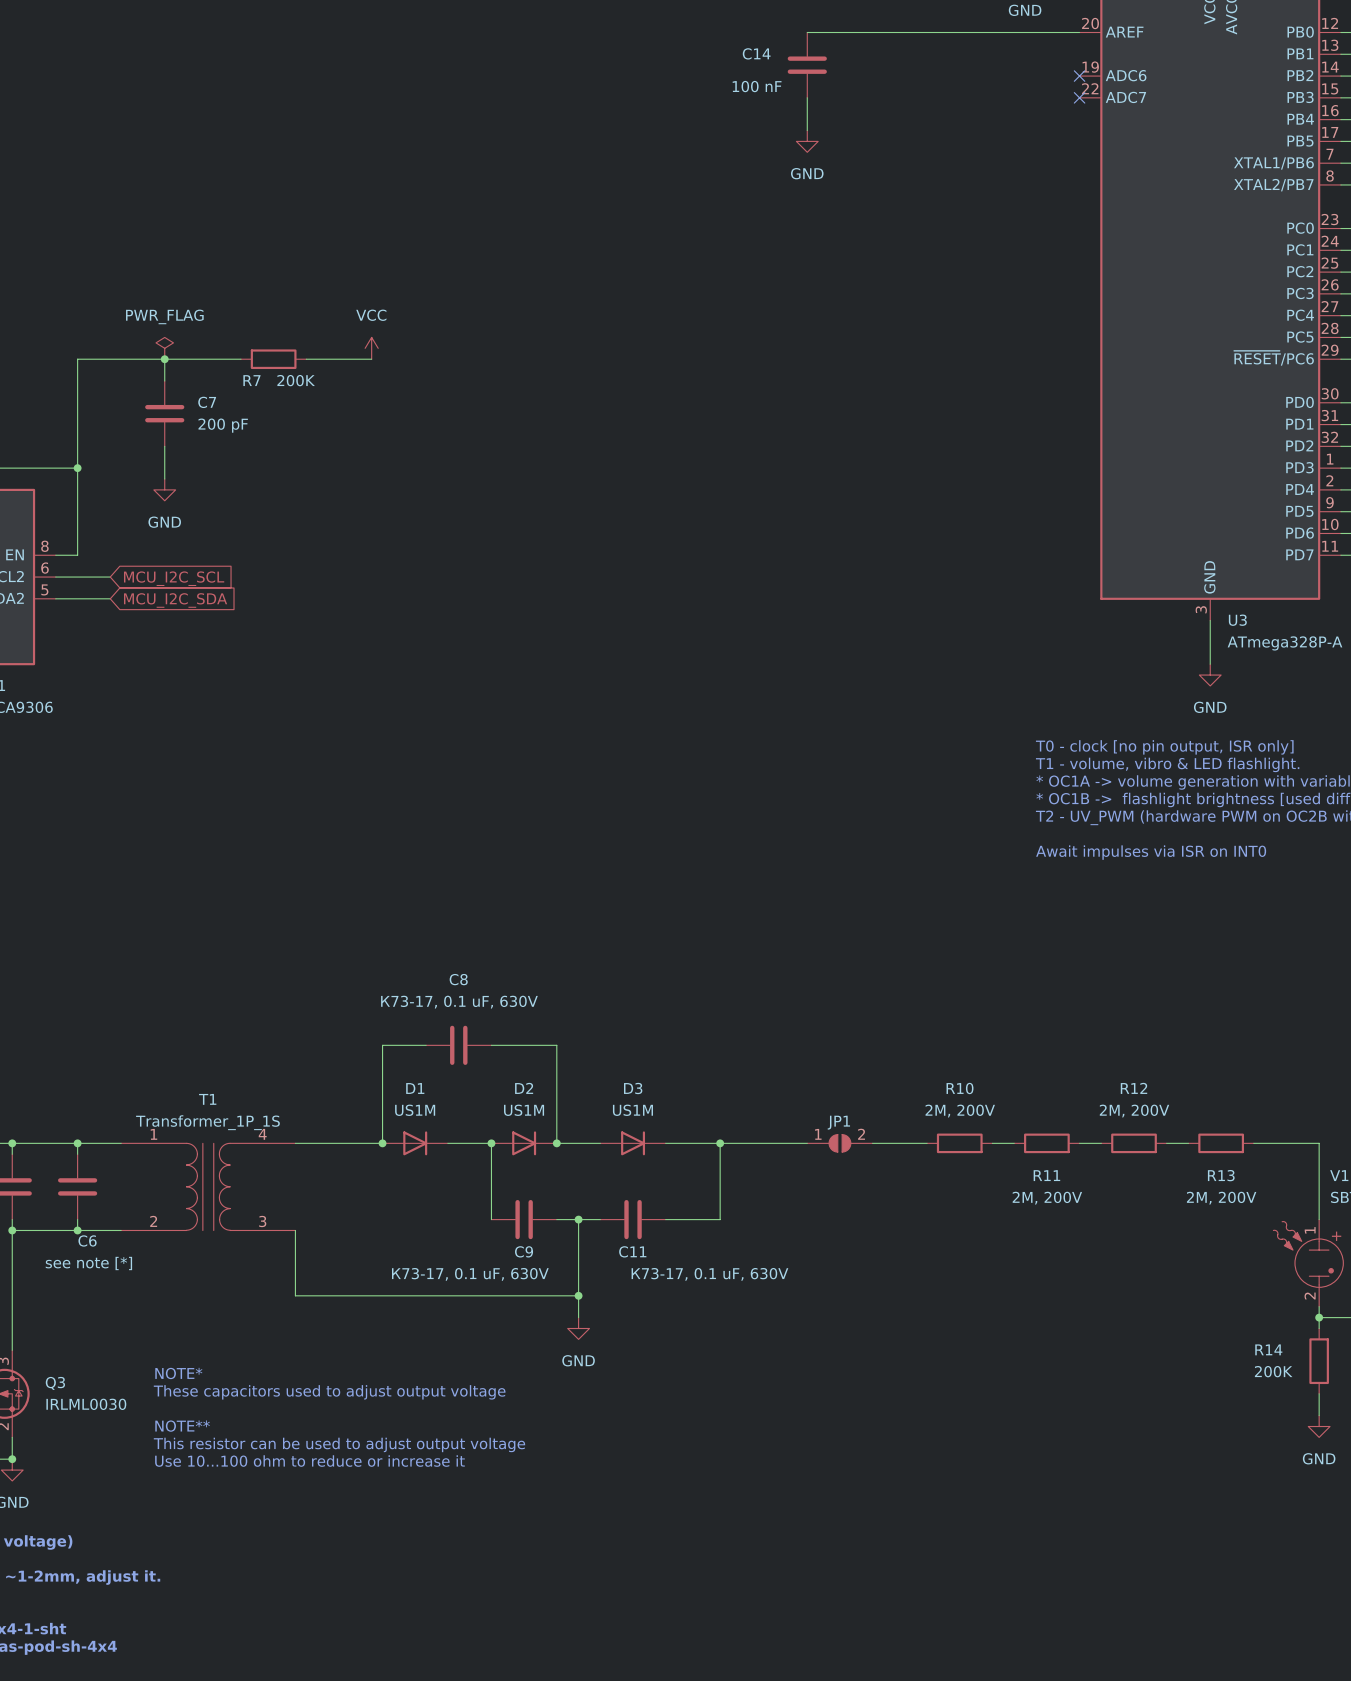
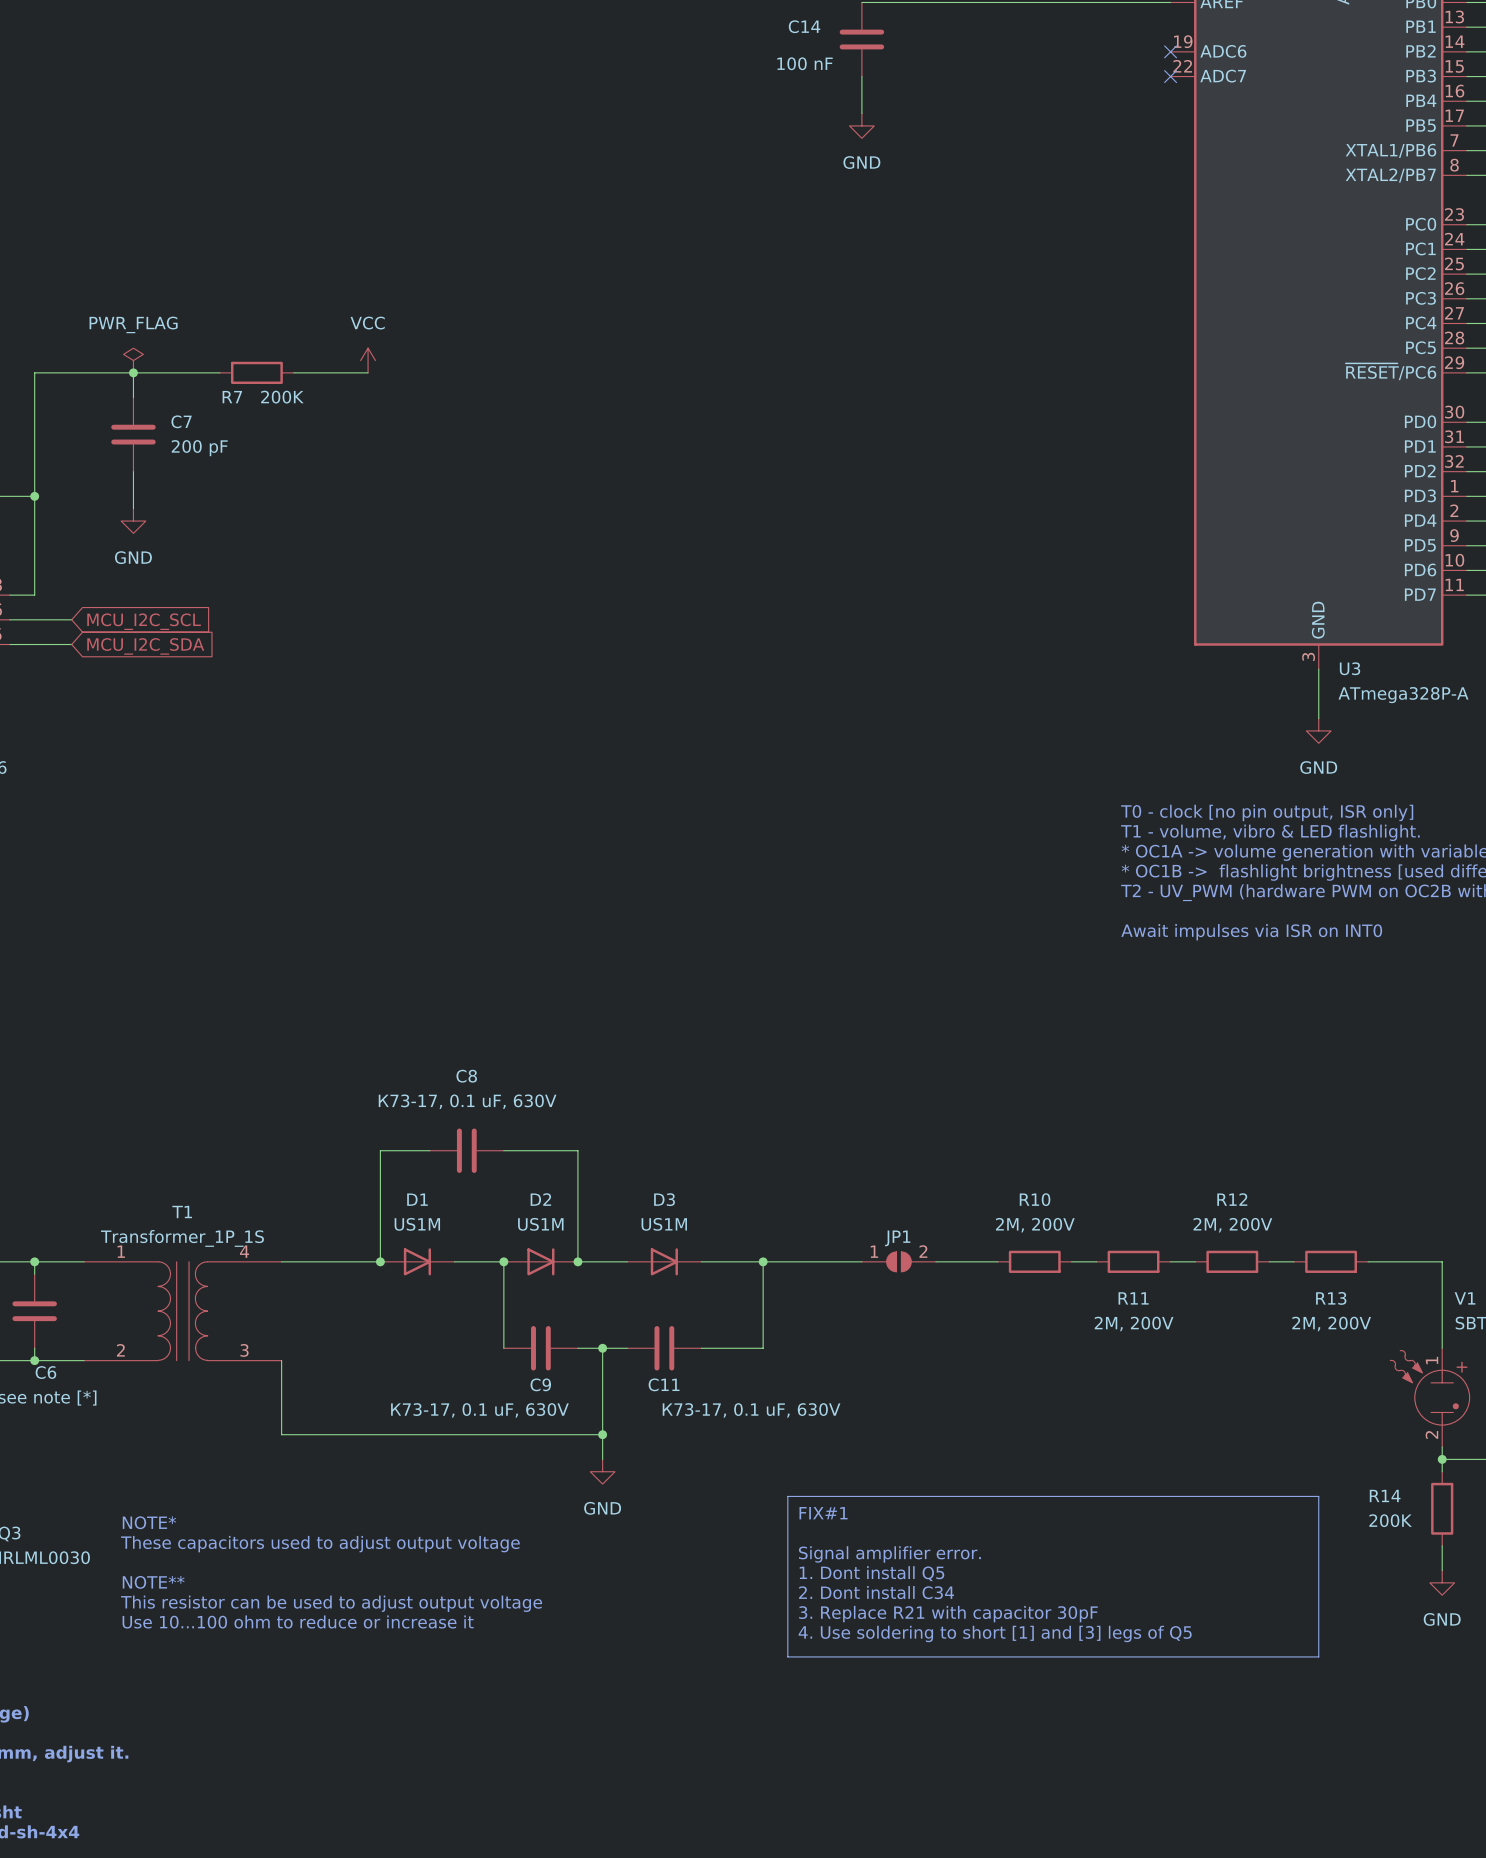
line: none -> (787, 1496) (1318, 1496) (1318, 1656) (787, 1656) (787, 1496)
text: none -> FIX#1 (823, 1513)
text: none -> Signal amplifier error. (889, 1554)
text: none -> 1. Dont install Q5 (871, 1573)
text: none -> 2. Dont install C34 (876, 1592)
text: none -> 3. Replace R21 with capacitor 30pF (948, 1614)
text: none -> 4. Use soldering to short [1] and [3] legs of Q5 (995, 1633)

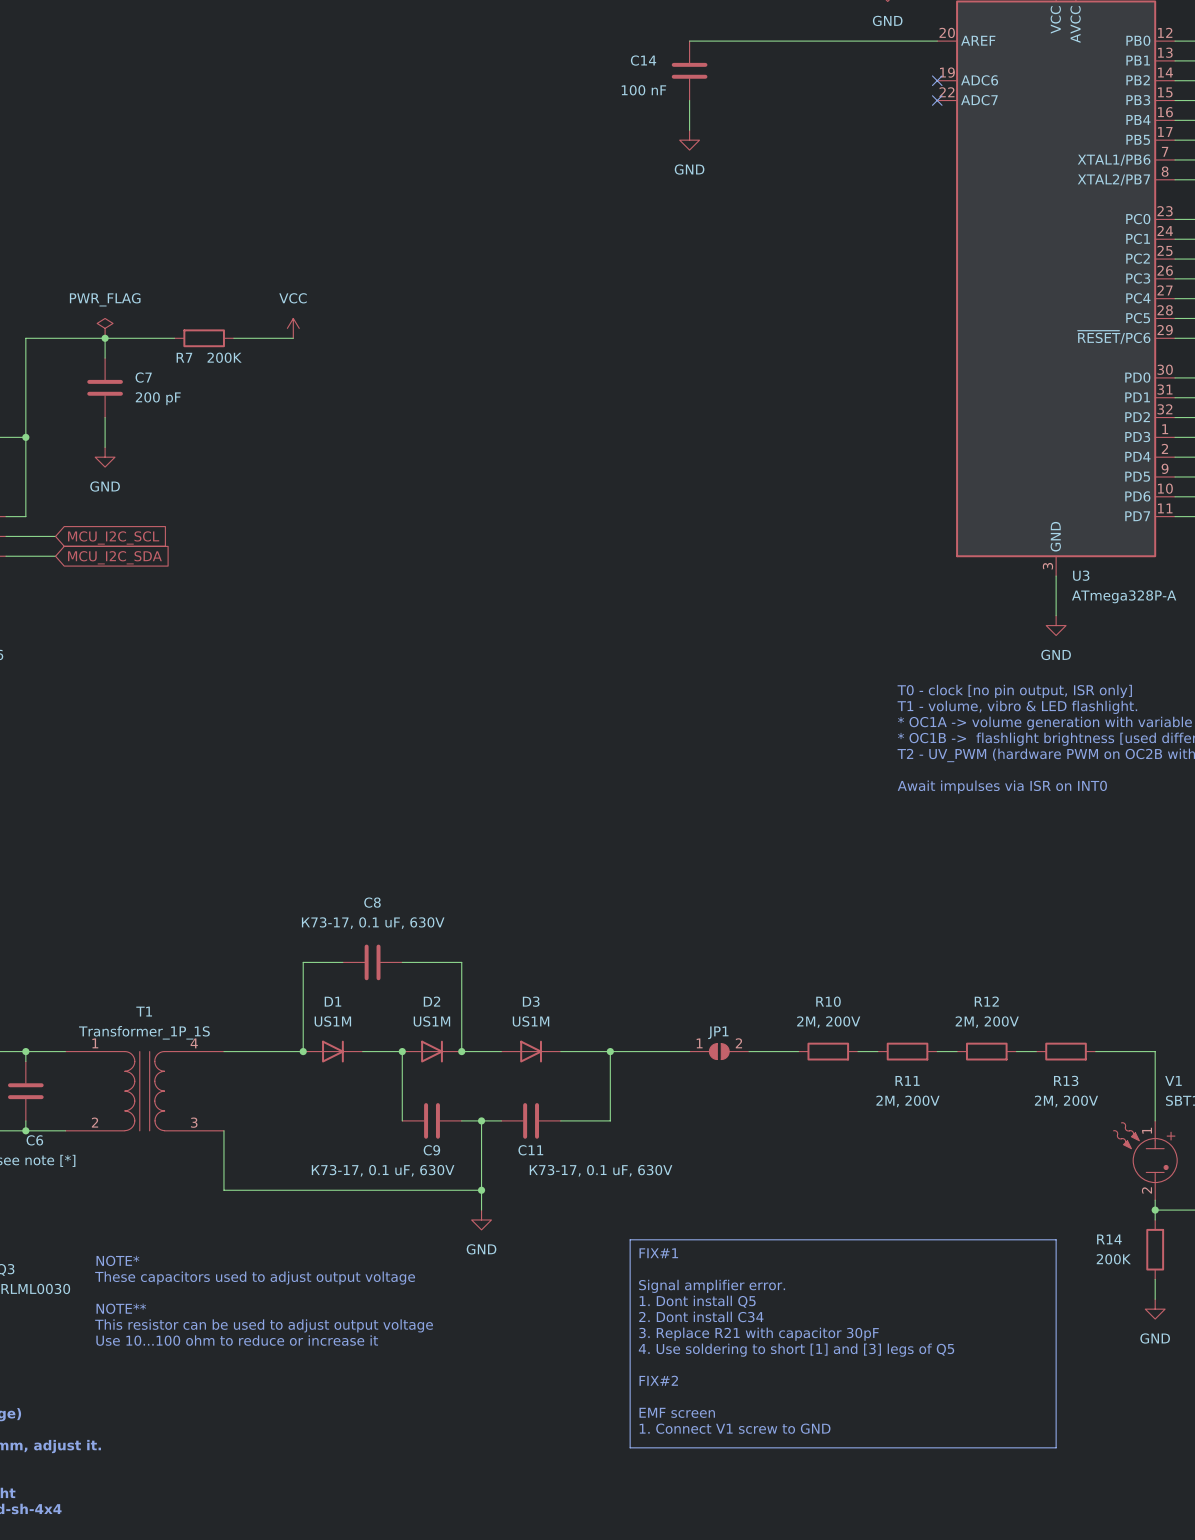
line: (787, 1656) (1318, 1656) -> (630, 1368) (630, 1447) (1056, 1447) (1056, 1368)
text: none -> FIX#2 (658, 1380)
text: none -> EMF screen (677, 1412)
text: none -> 1. Connect V1 screw to GND (735, 1428)

